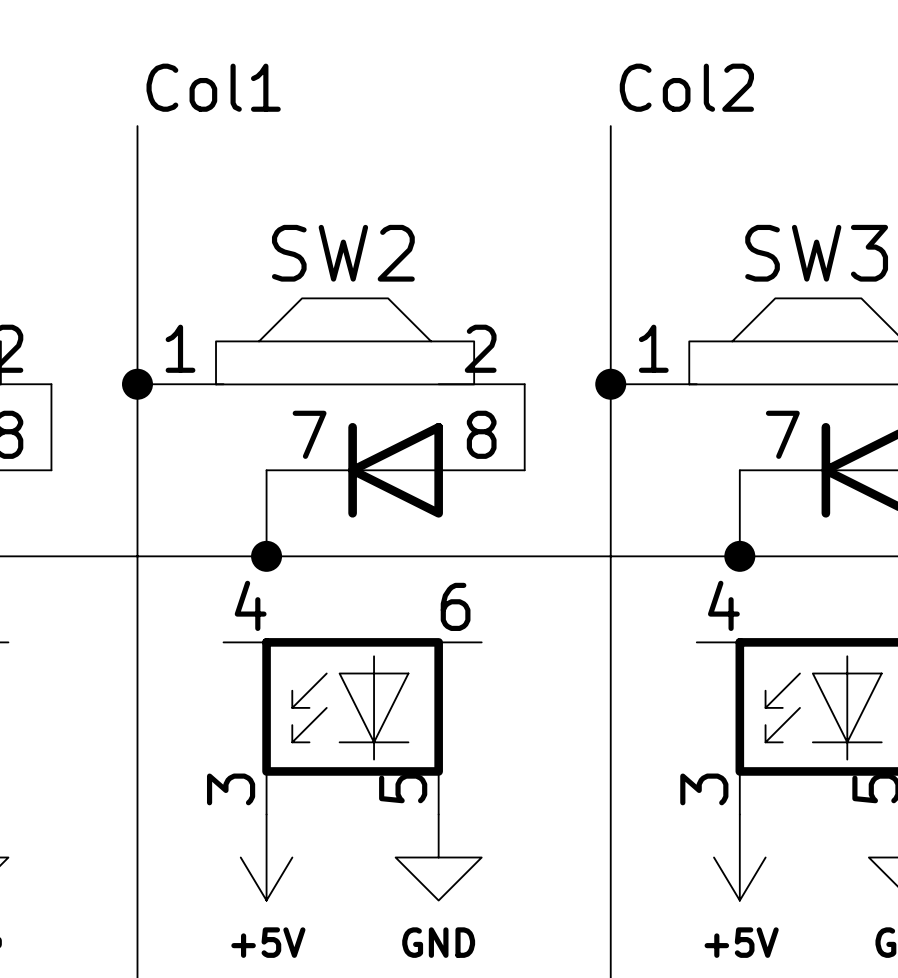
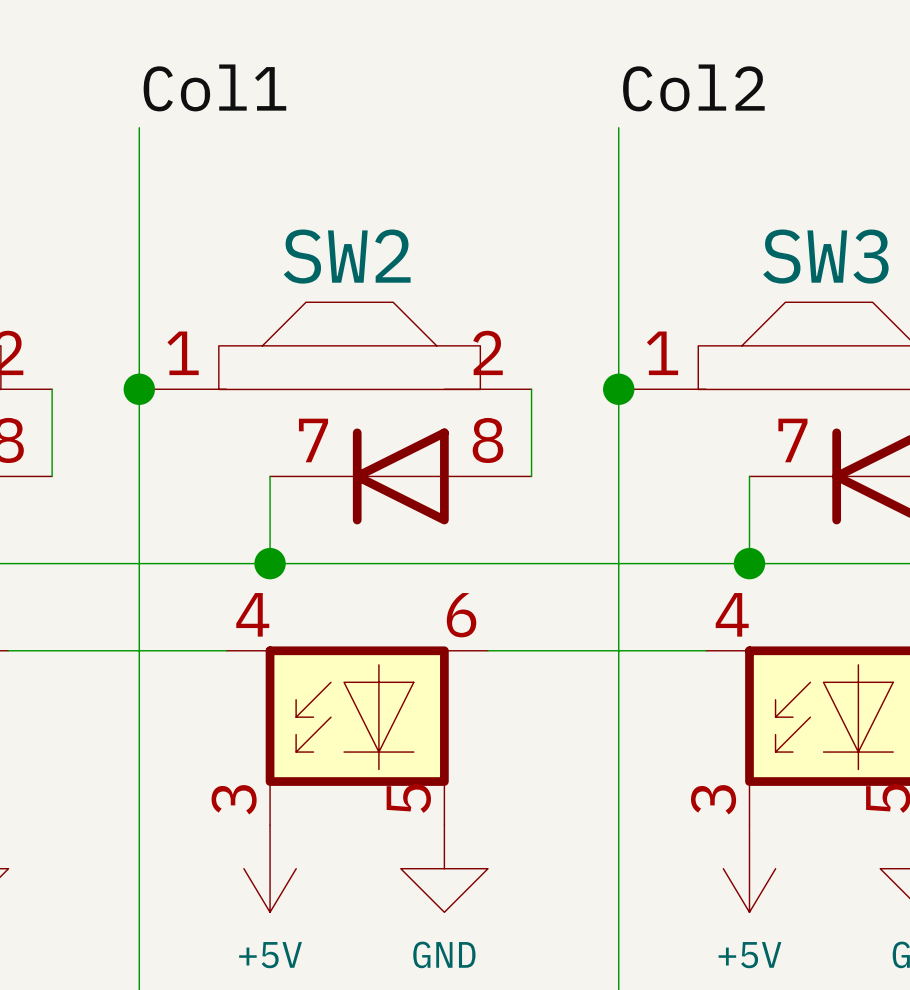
wire: none -> (8, 650) (226, 650)
wire: none -> (487, 650) (705, 650)

